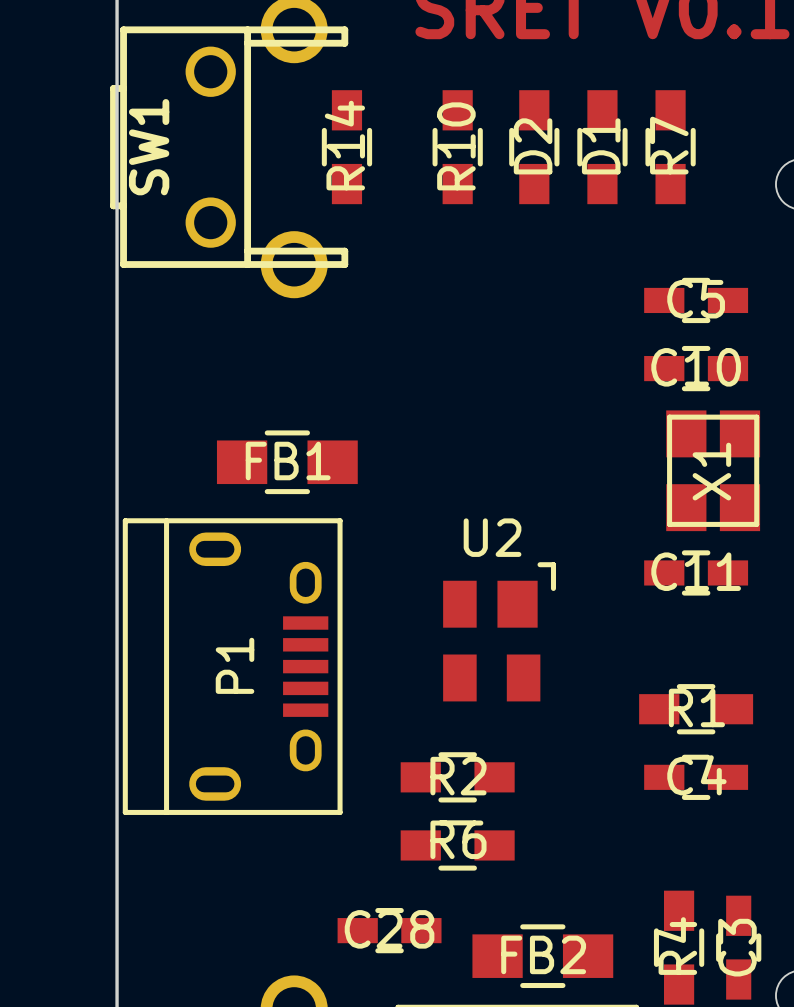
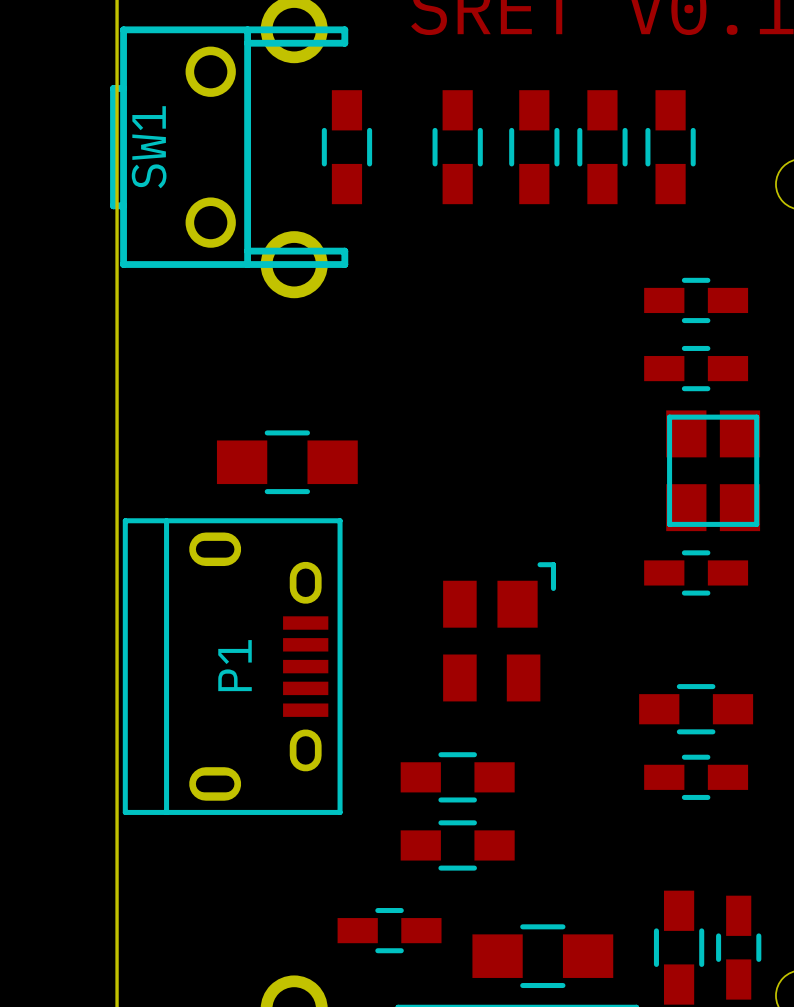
R14 name: R14 (344, 145) -> none
R7 name: R7 (669, 145) -> none
R10 name: R10 (456, 146) -> none
D2 name: D2 (533, 146) -> none
D1 name: D1 (601, 146) -> none
C5 name: C5 (696, 299) -> none
C10 name: C10 (696, 367) -> none
FB1 name: FB1 (288, 461) -> none
X1 name: X1 (711, 471) -> none
U2 name: U2 (492, 537) -> none
C11 name: C11 (696, 571) -> none
R1 name: R1 (696, 707) -> none
C4 name: C4 (696, 775) -> none
R2 name: R2 (458, 776) -> none
R6 name: R6 (458, 839) -> none
C28 name: C28 (389, 929) -> none
R4 name: R4 (677, 946) -> none
C3 name: C3 (737, 947) -> none
FB2 name: FB2 (543, 954) -> none

